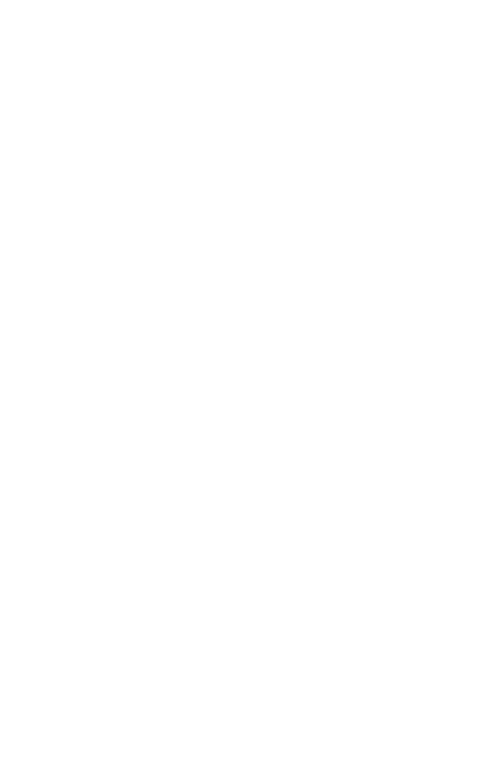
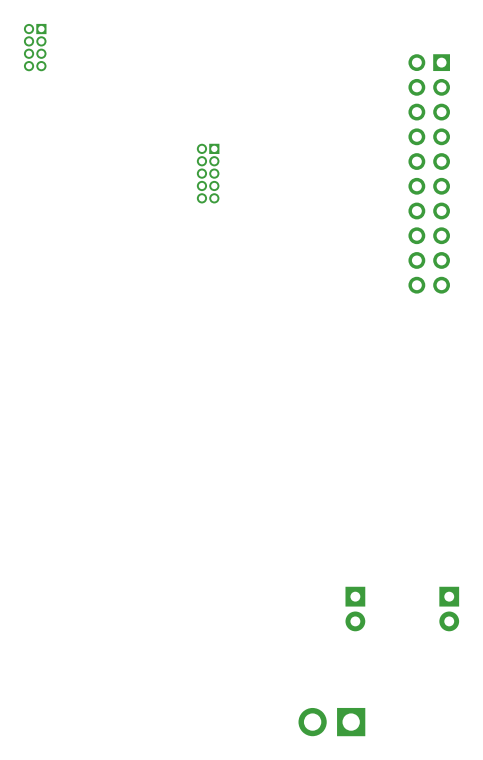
part: none -> (35, 47)
part: none -> (208, 173)
part: none -> (429, 173)
part: none -> (355, 609)
part: none -> (449, 609)
part: none -> (331, 722)

